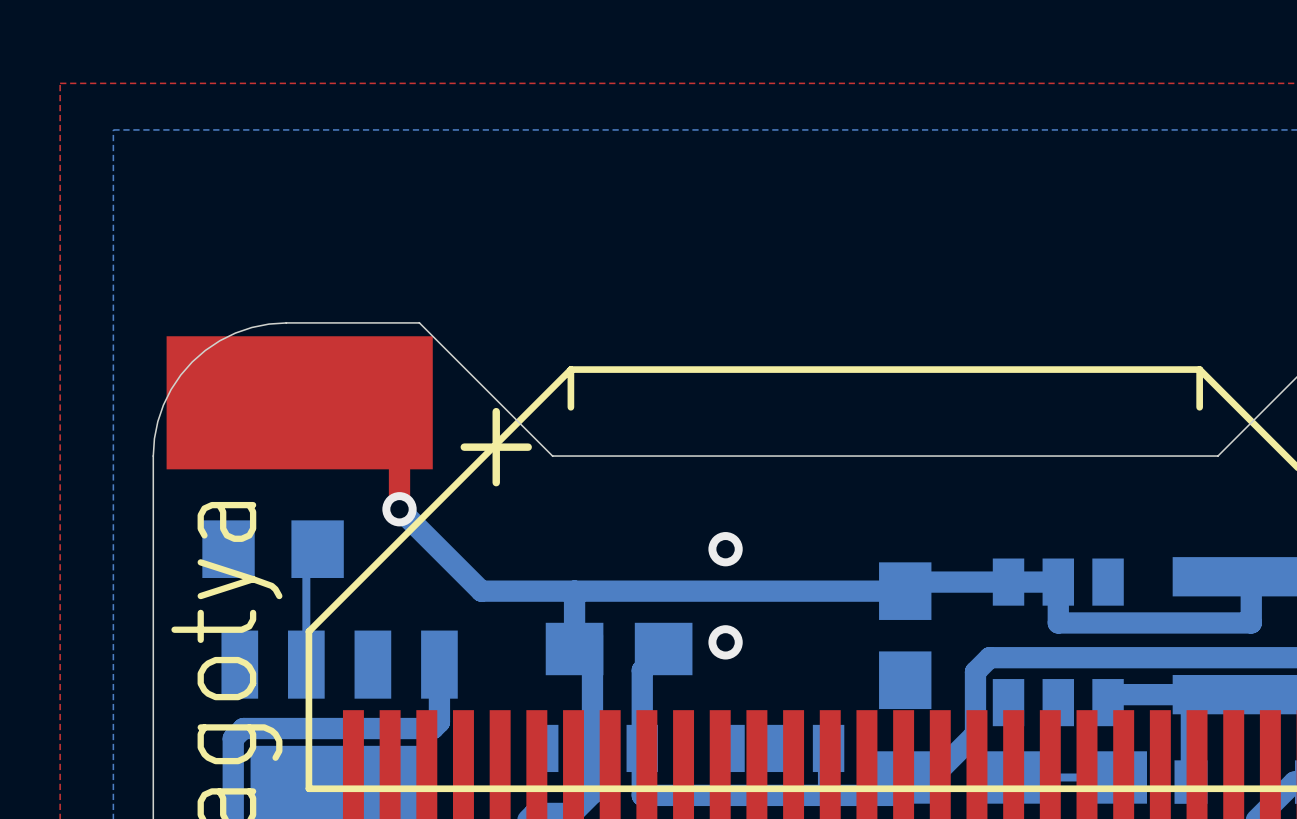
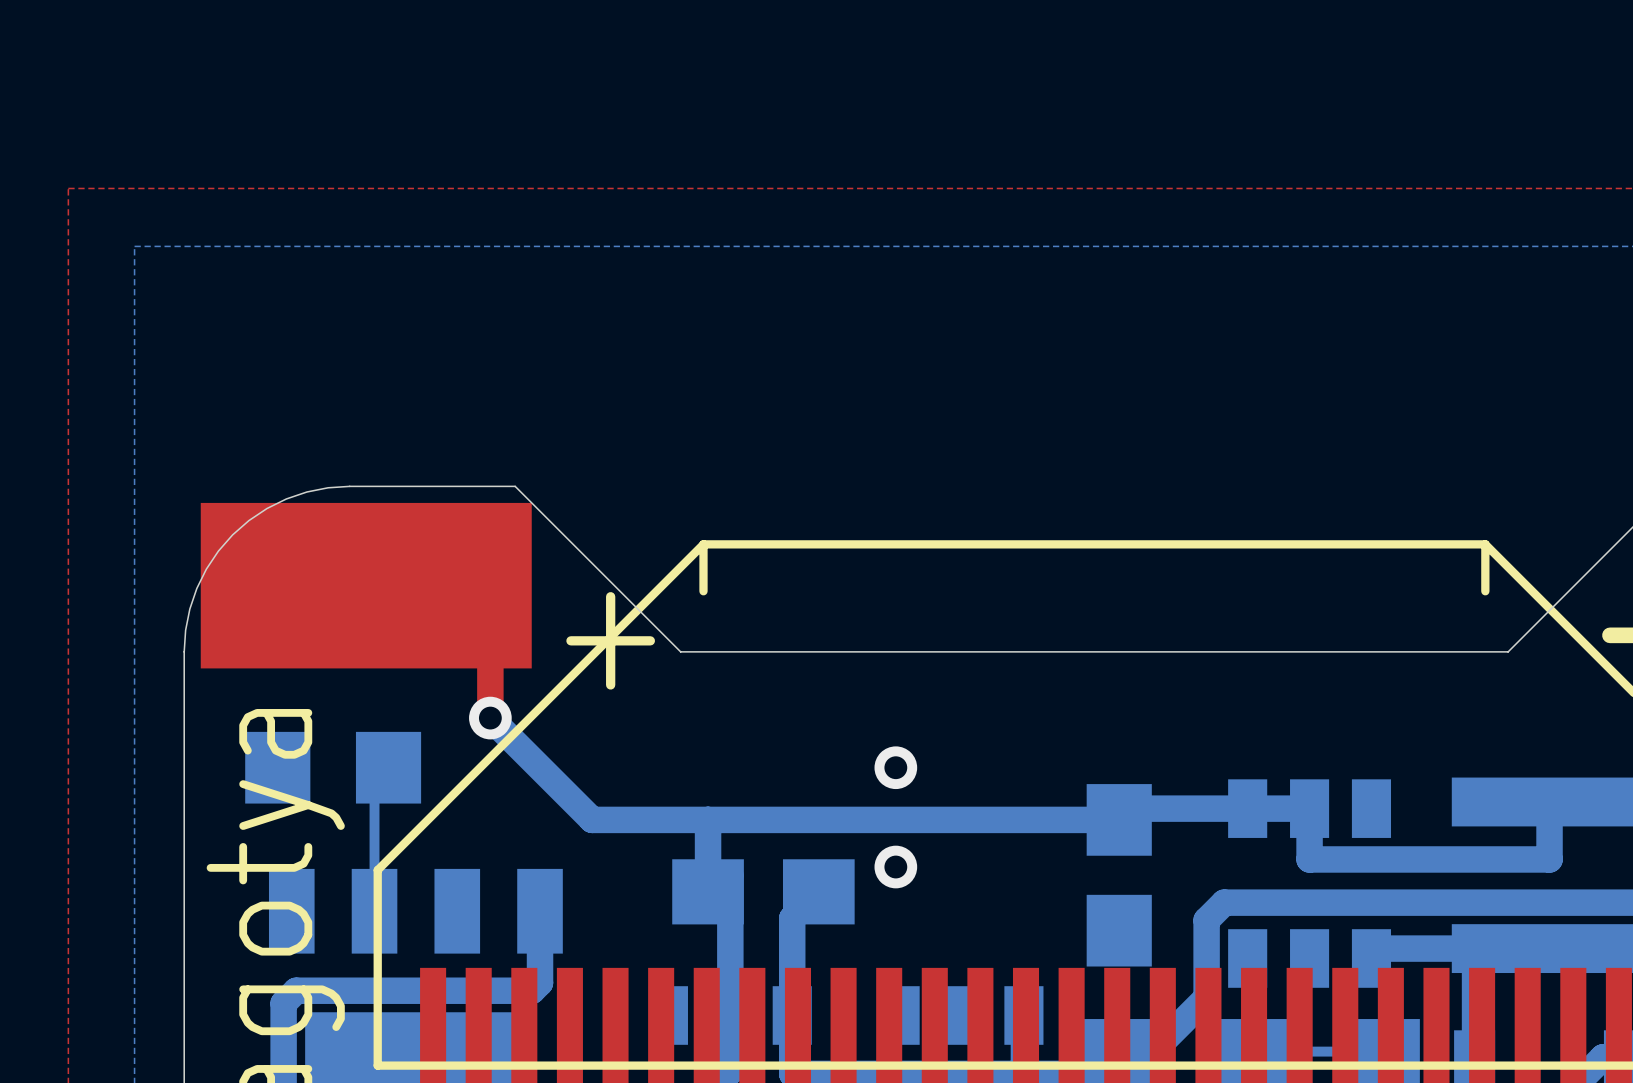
via position: (725, 642) -> (895, 867)

